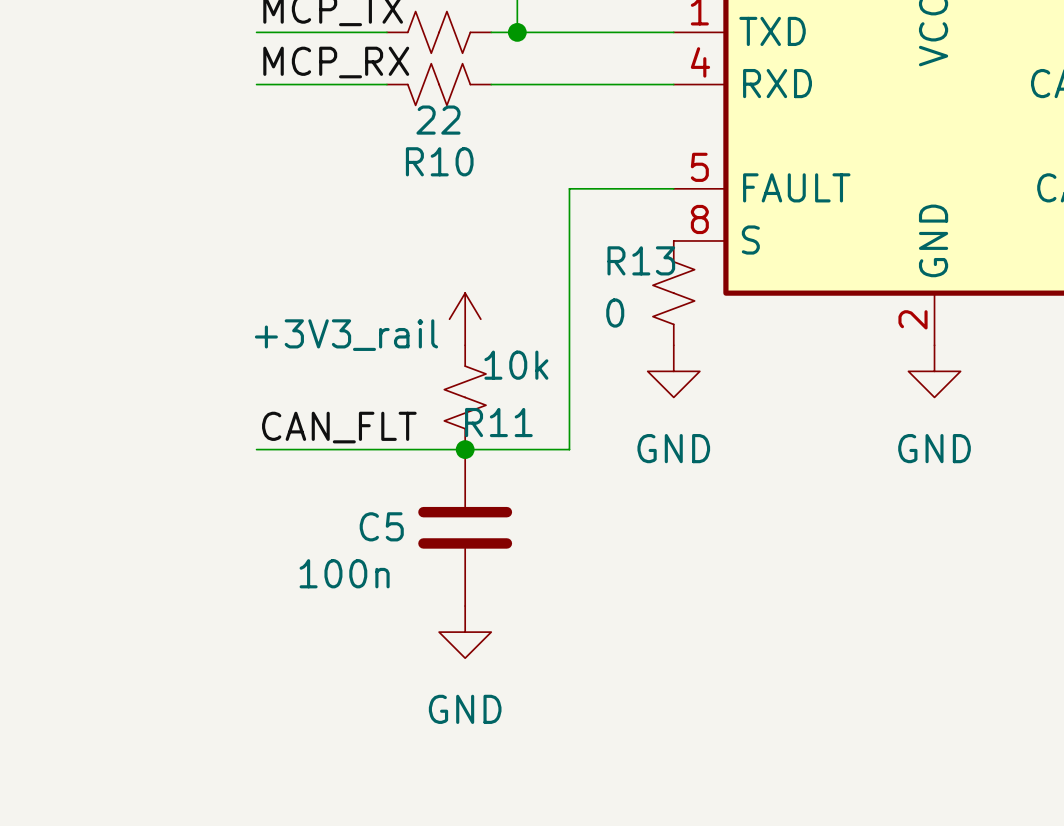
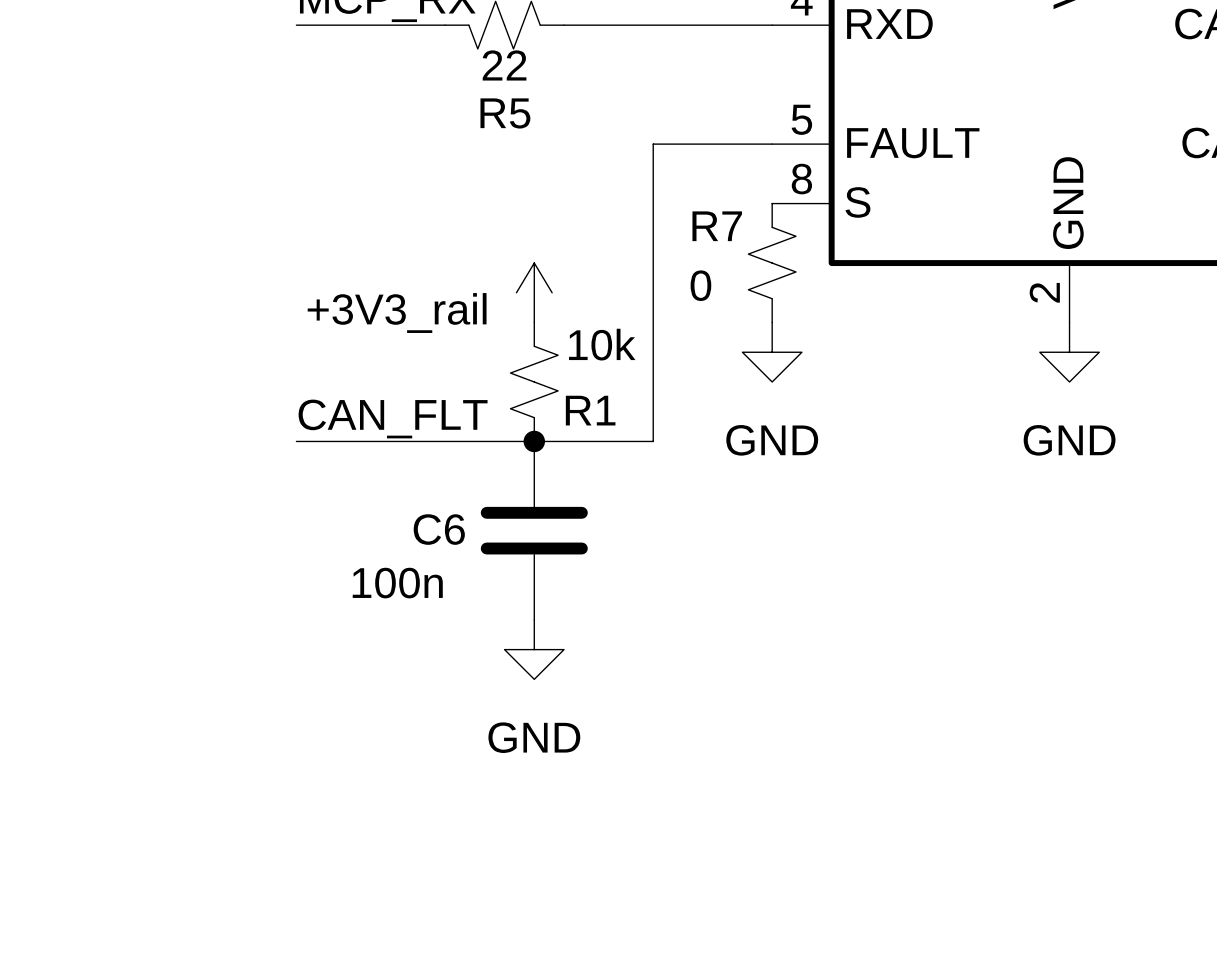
R10 name: R10 (439, 161) -> R5 (505, 113)
R13 name: R13 (641, 260) -> R7 (717, 226)
R11 name: R11 (498, 422) -> R1 (590, 410)
C5 name: C5 (381, 526) -> C6 (439, 529)

